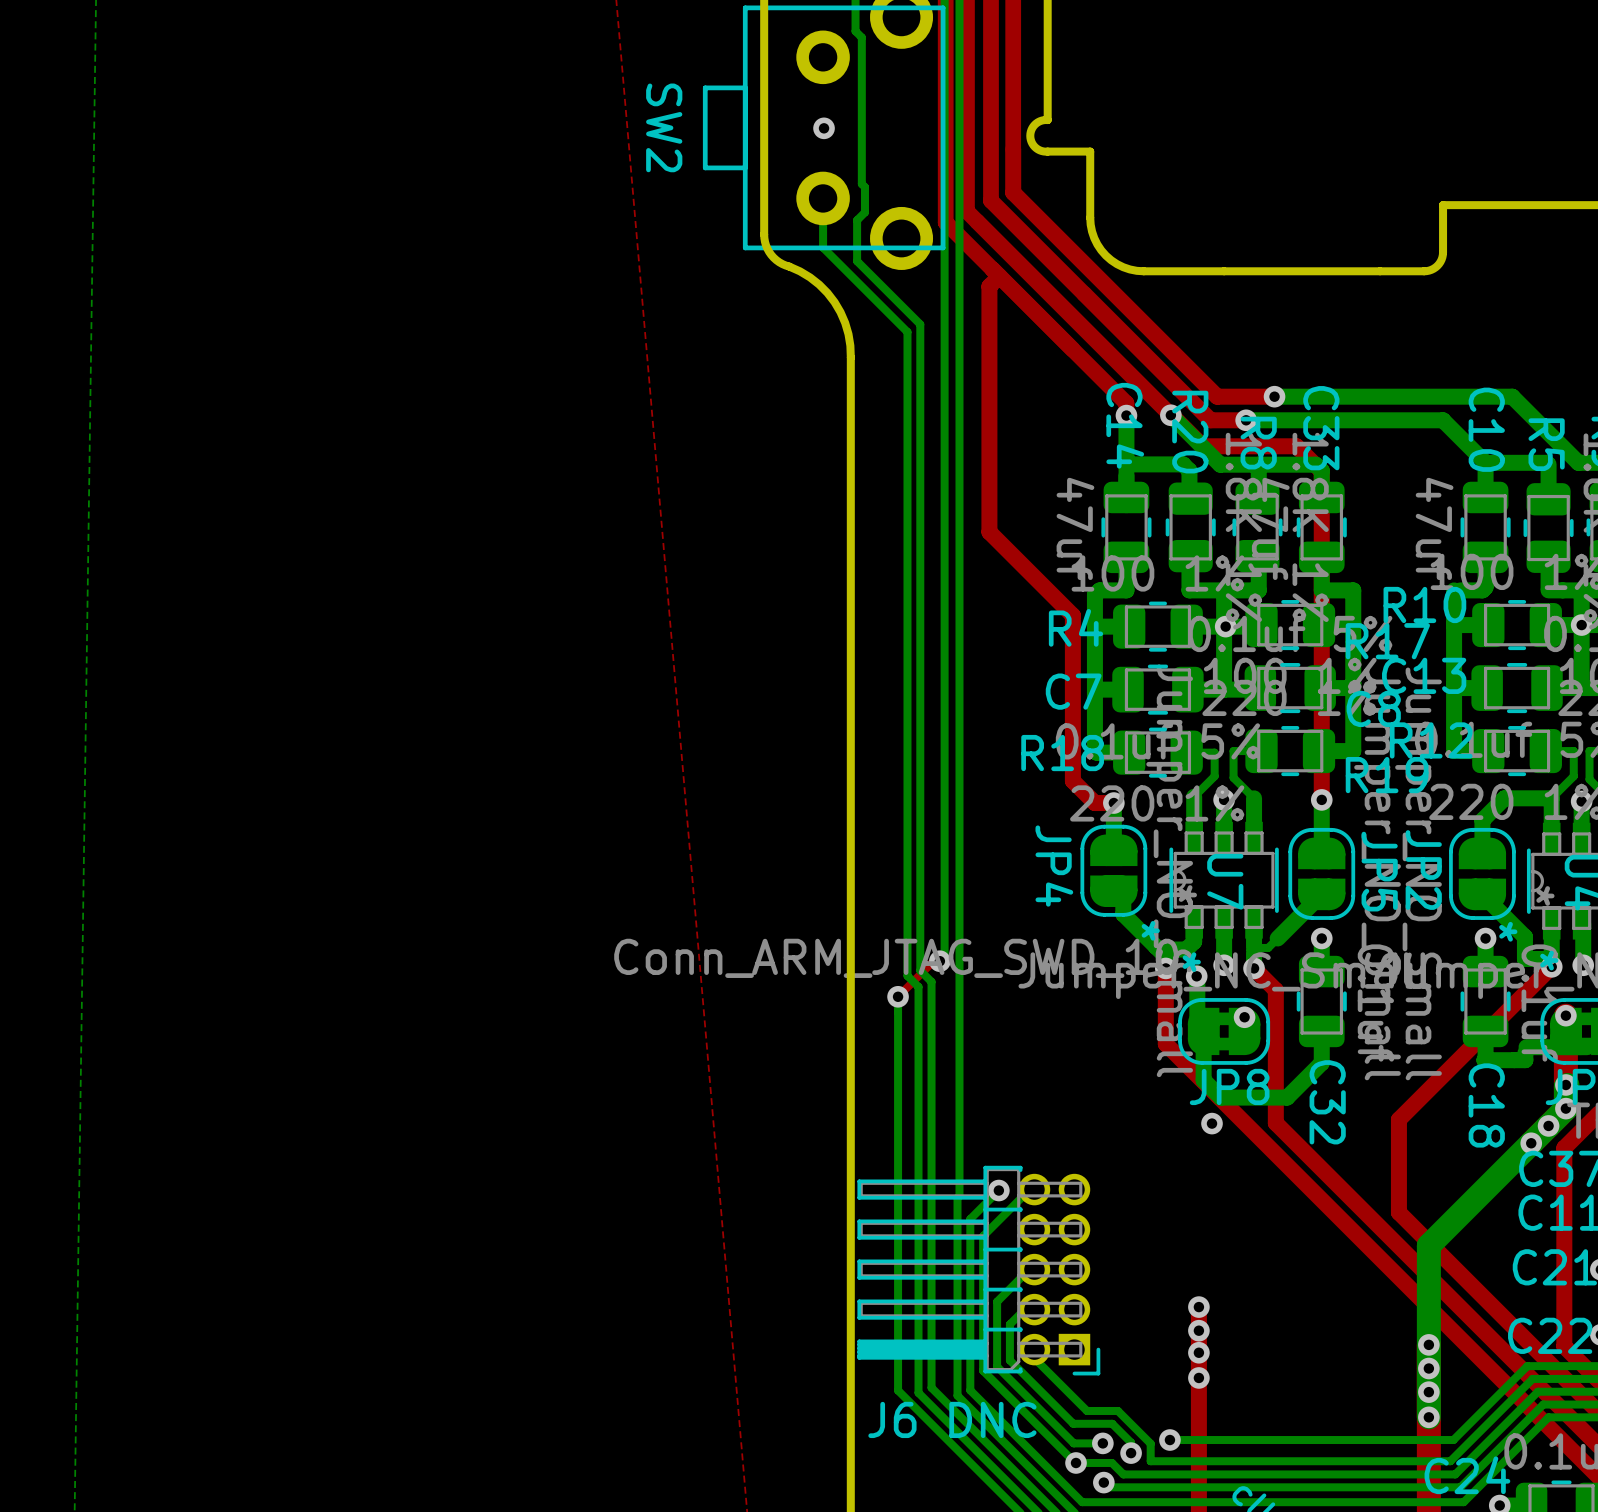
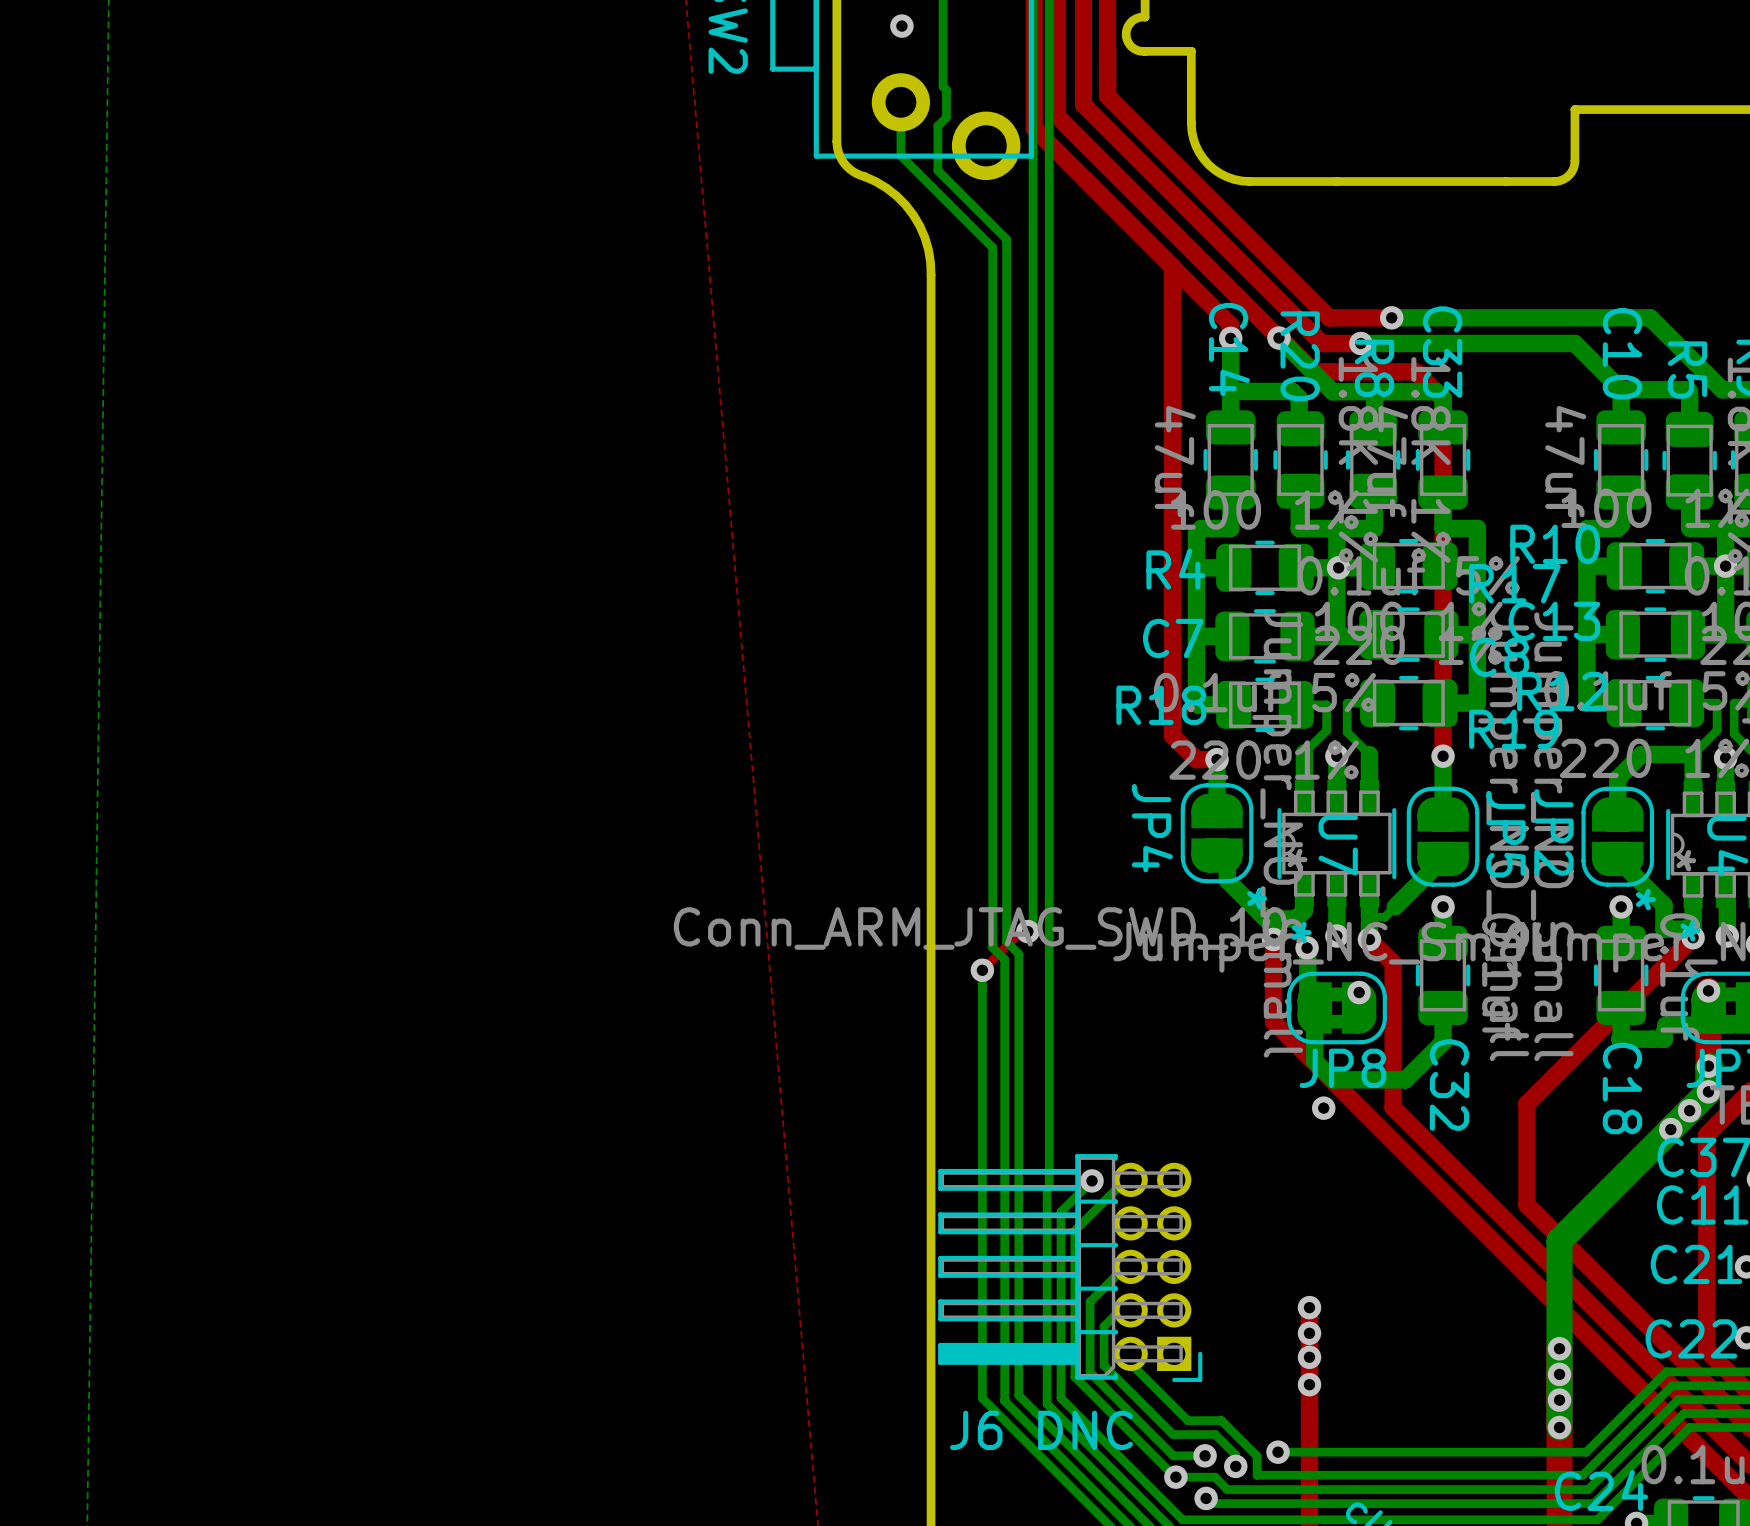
top track: (999, 276) (989, 286) (989, 532) (1072, 615) -> (1172, 266) (1172, 555)

